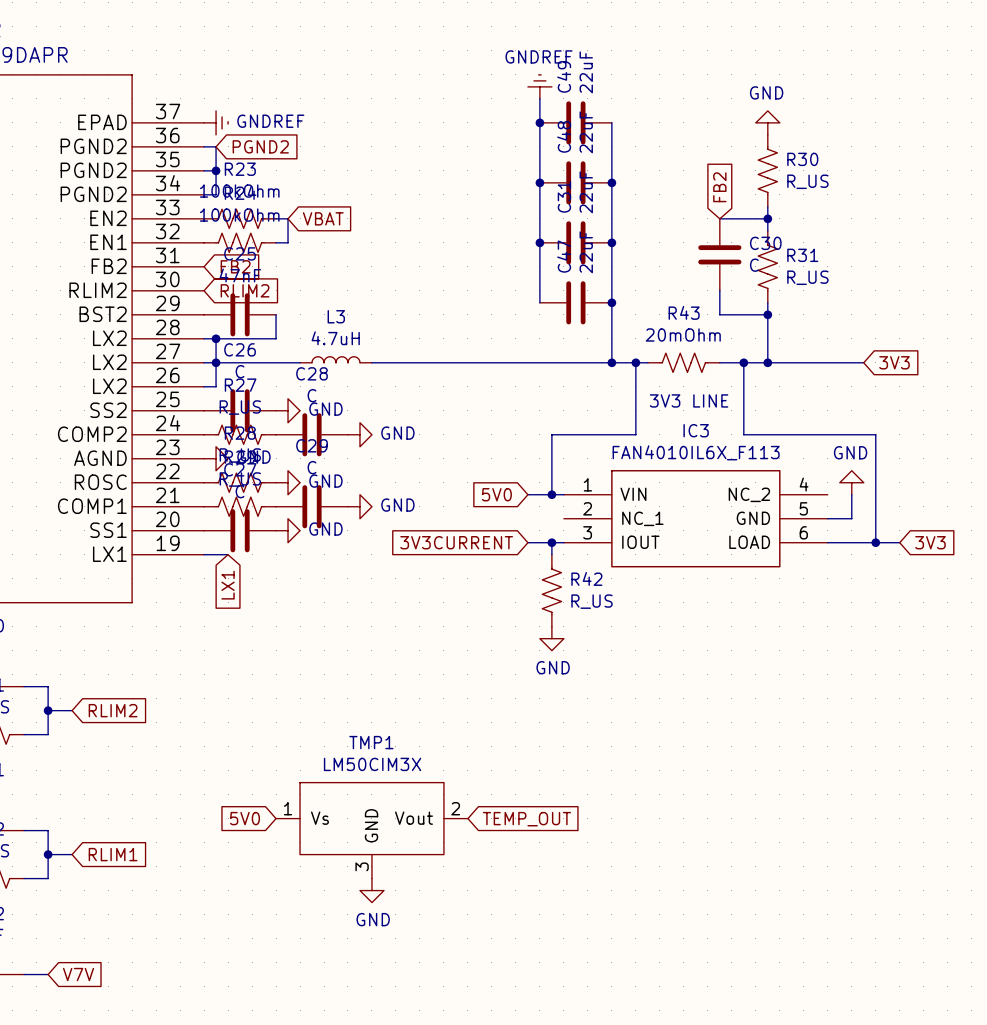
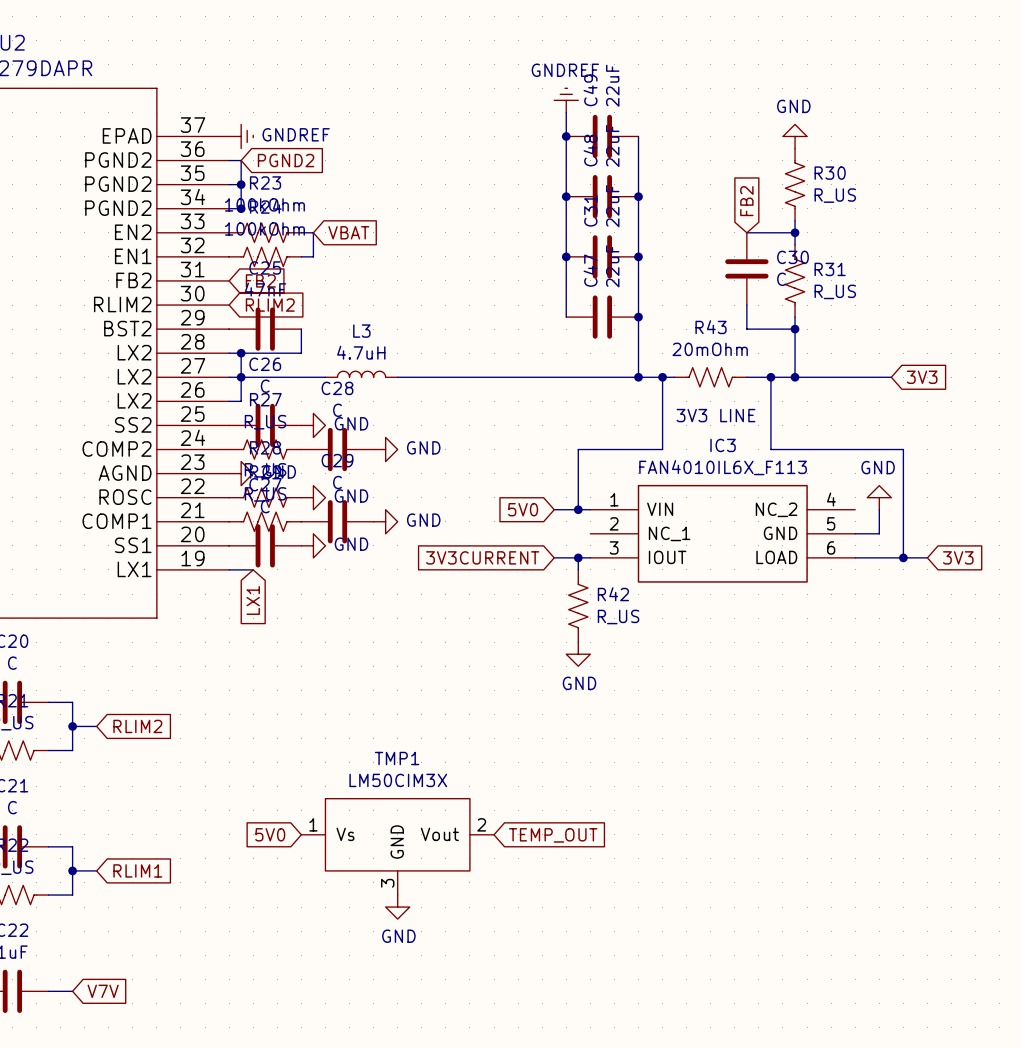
junction: none -> (241, 208)

